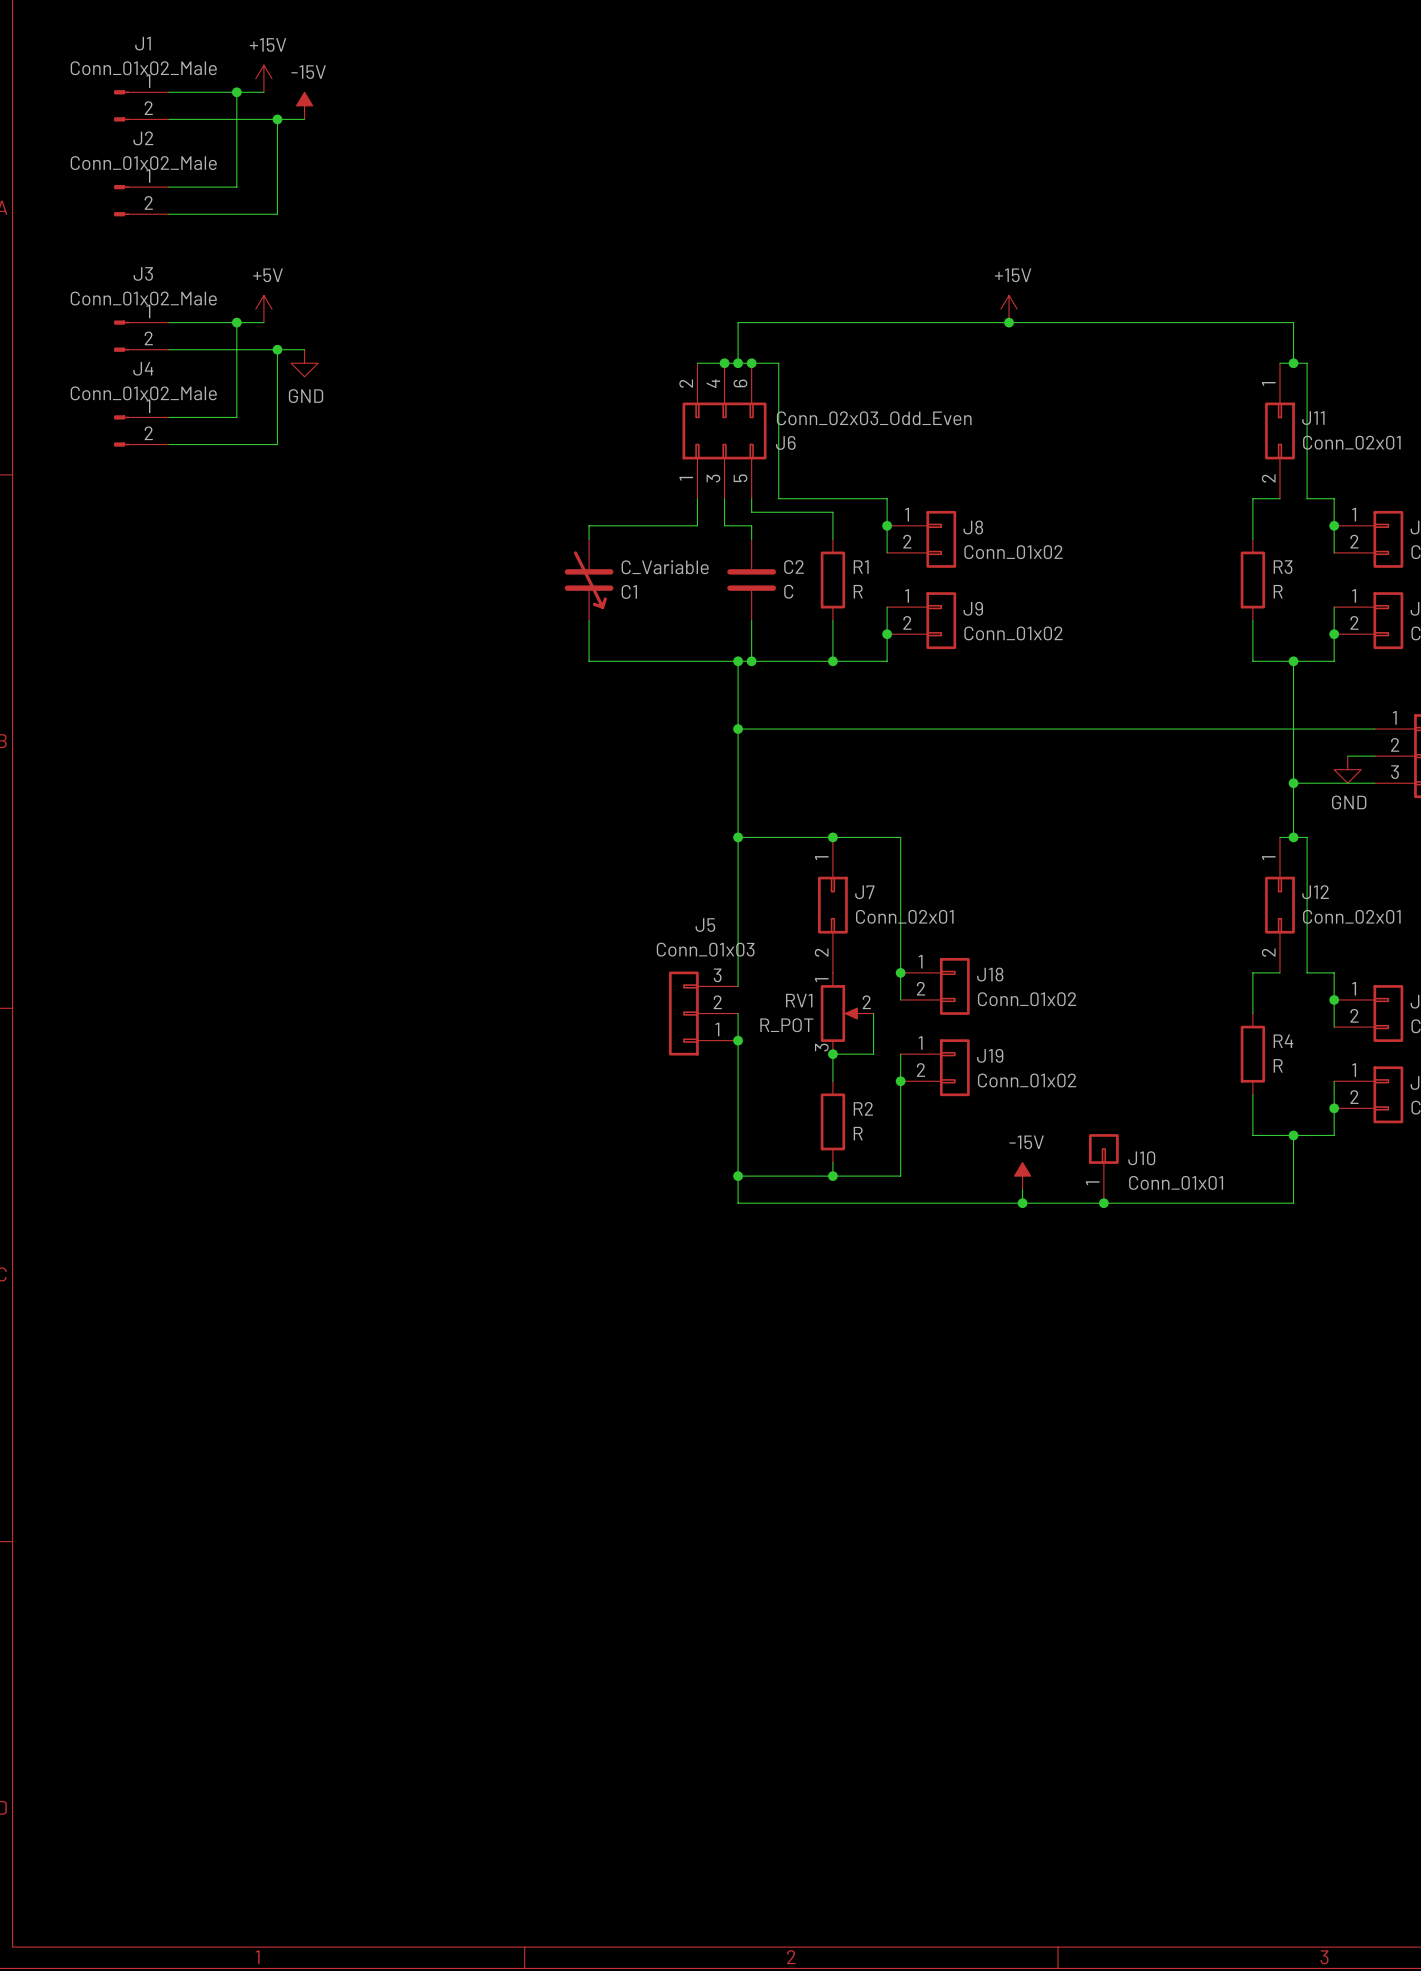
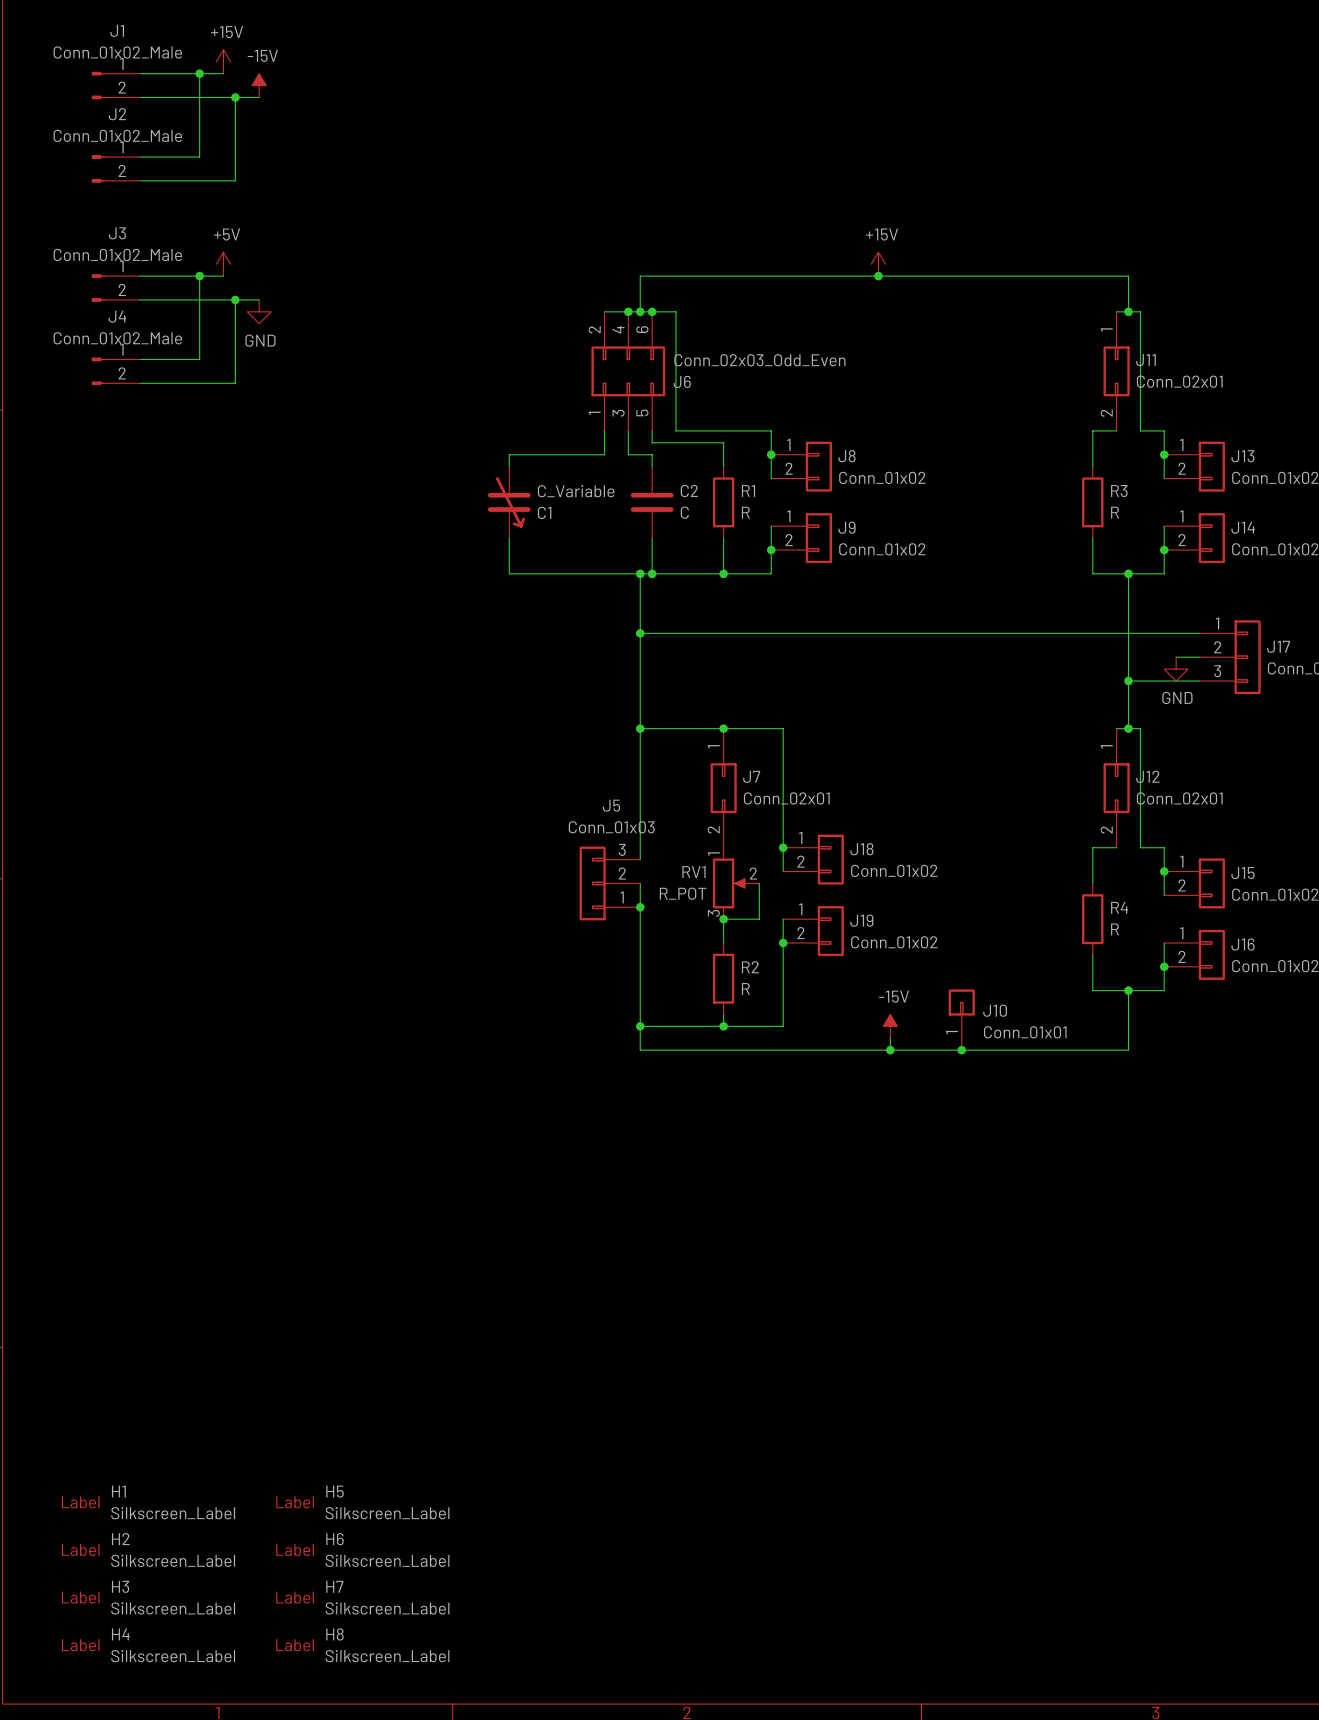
H1: none -> Silkscreen_Label (148, 1502)
H5: none -> Silkscreen_Label (362, 1502)
H2: none -> Silkscreen_Label (148, 1550)
H6: none -> Silkscreen_Label (362, 1550)
H3: none -> Silkscreen_Label (148, 1597)
H7: none -> Silkscreen_Label (362, 1597)
H4: none -> Silkscreen_Label (148, 1645)
H8: none -> Silkscreen_Label (362, 1645)

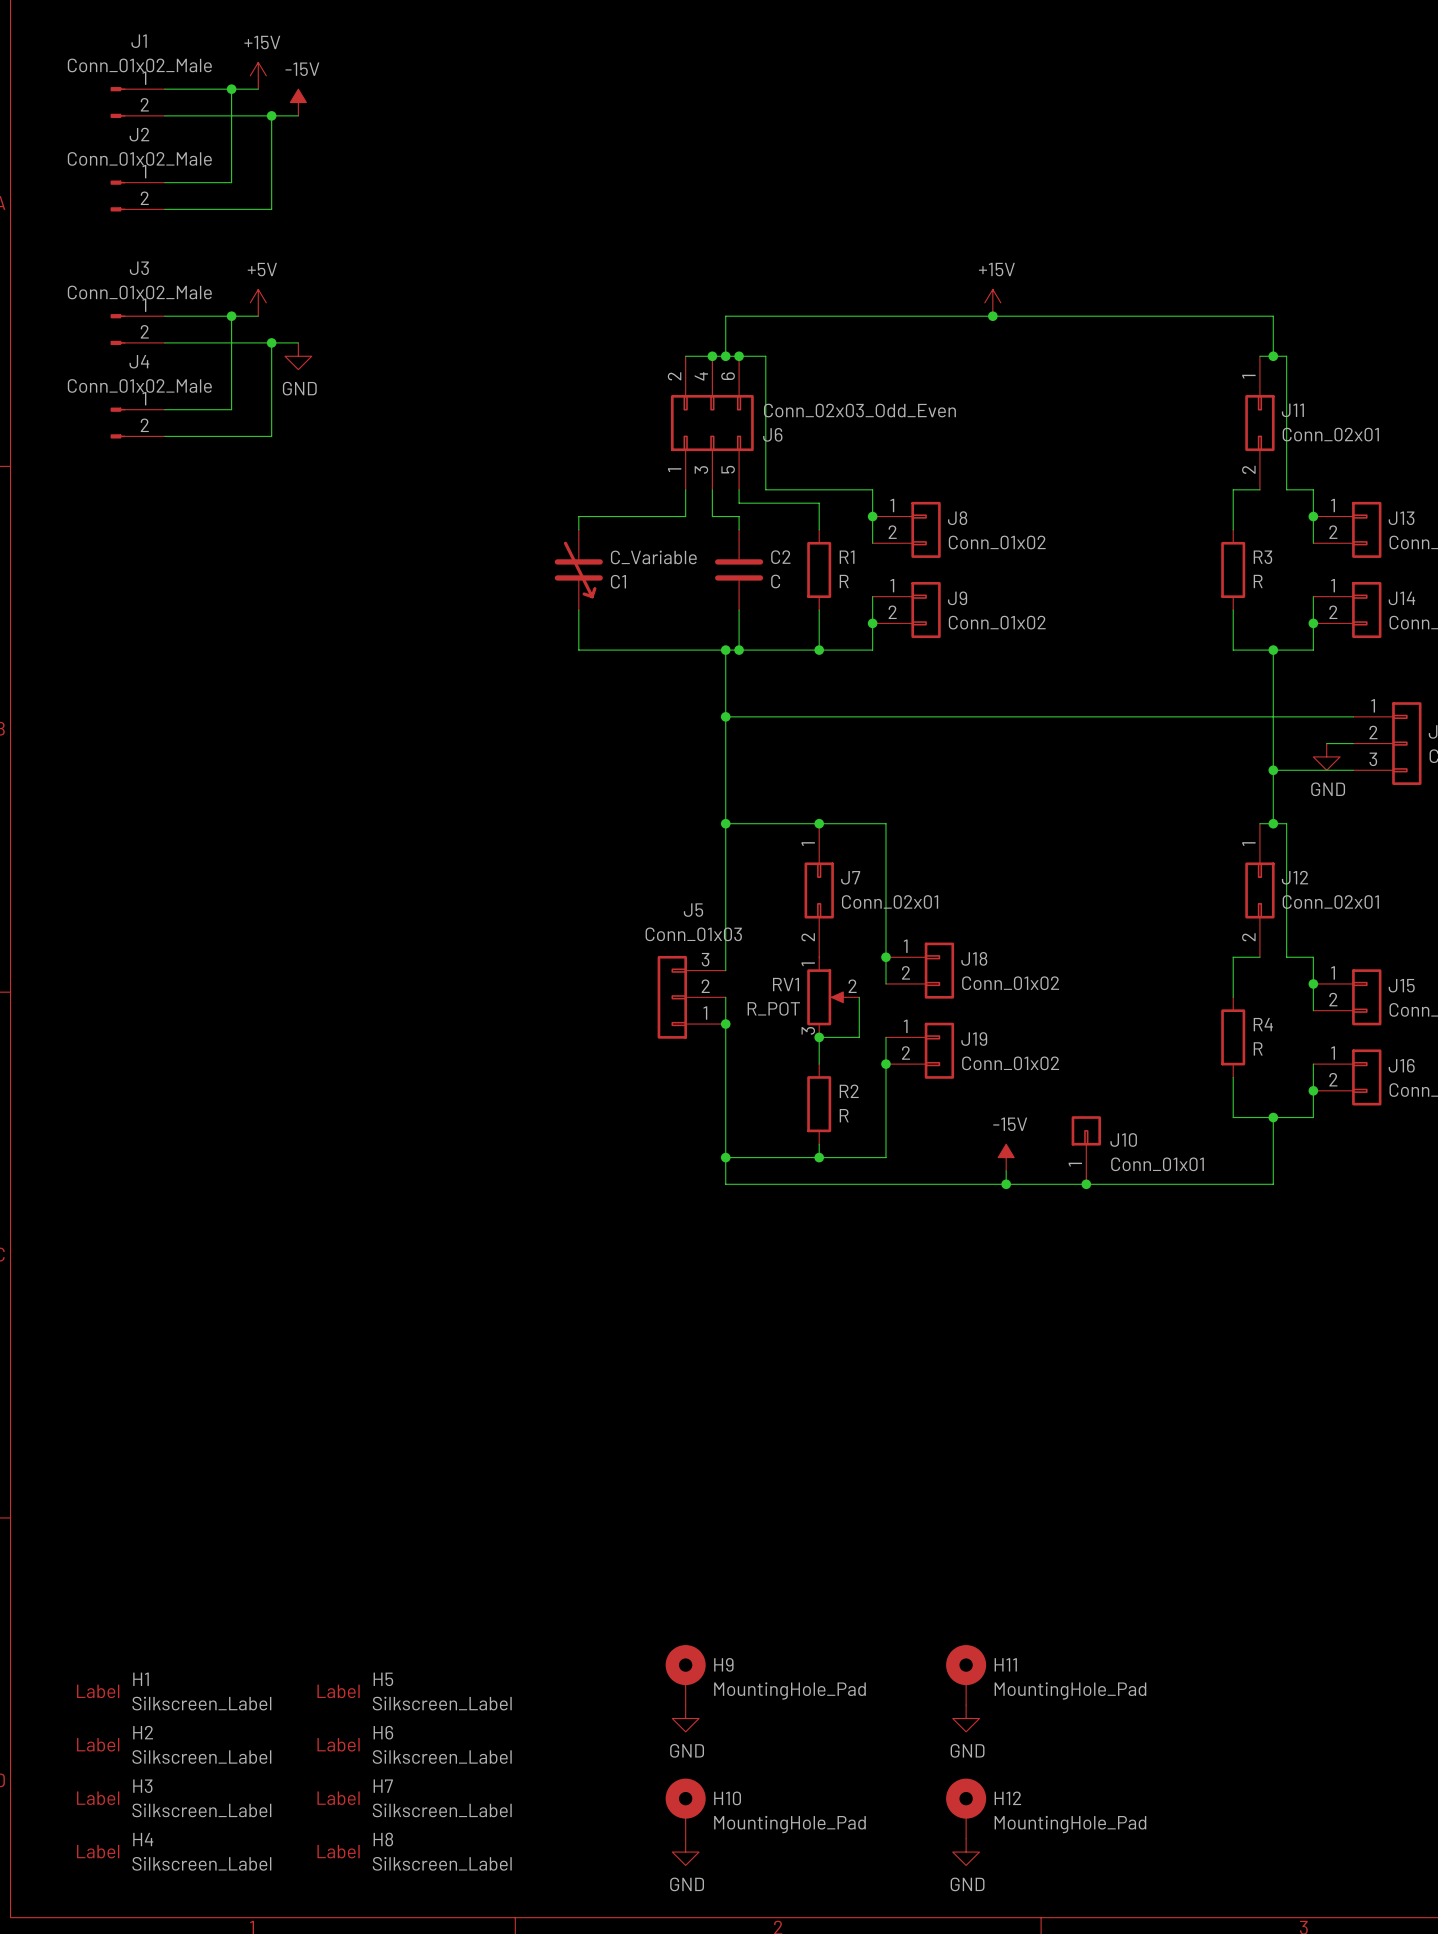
H9: none -> MountingHole_Pad (685, 1675)
H11: none -> MountingHole_Pad (966, 1675)
power symbol: none -> GND (685, 1718)
power symbol: none -> GND (966, 1718)
H10: none -> MountingHole_Pad (685, 1808)
H12: none -> MountingHole_Pad (966, 1808)
power symbol: none -> GND (685, 1852)
power symbol: none -> GND (966, 1852)

